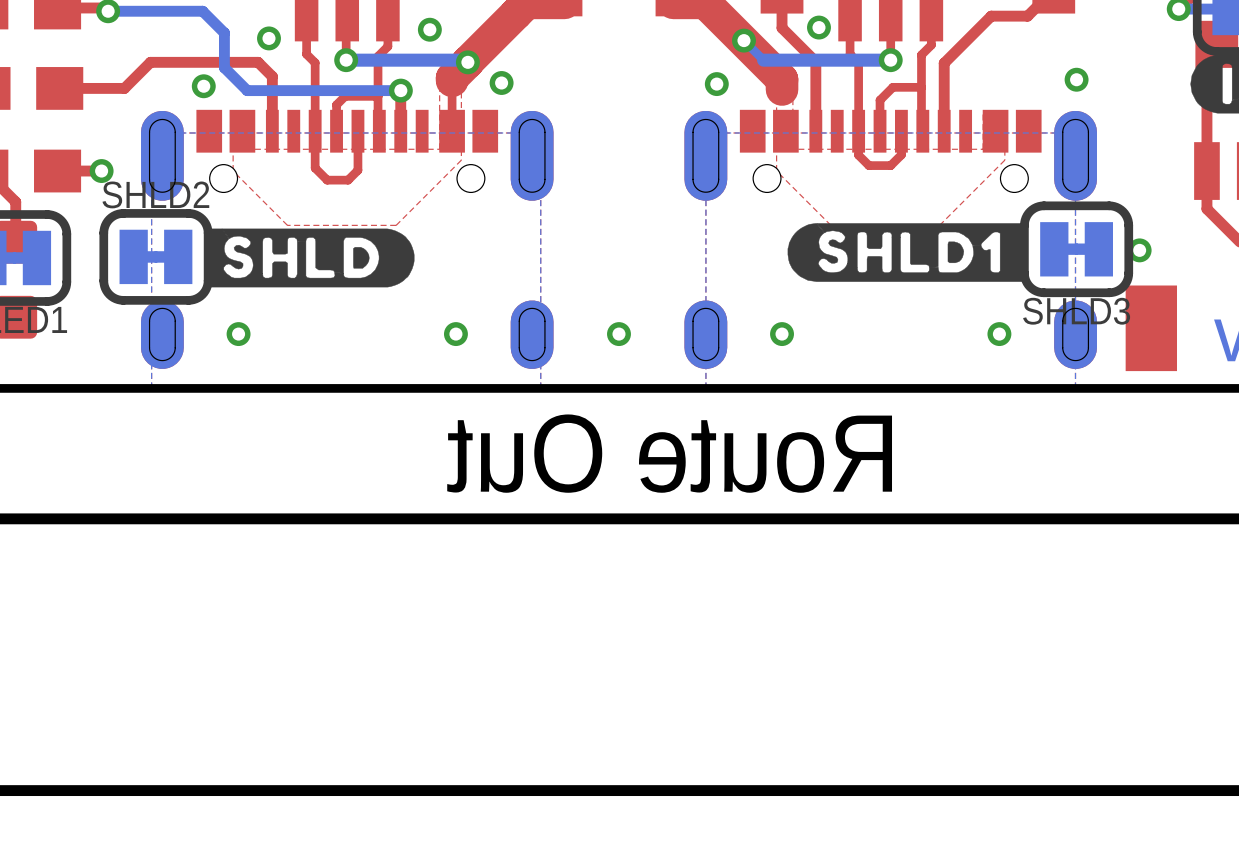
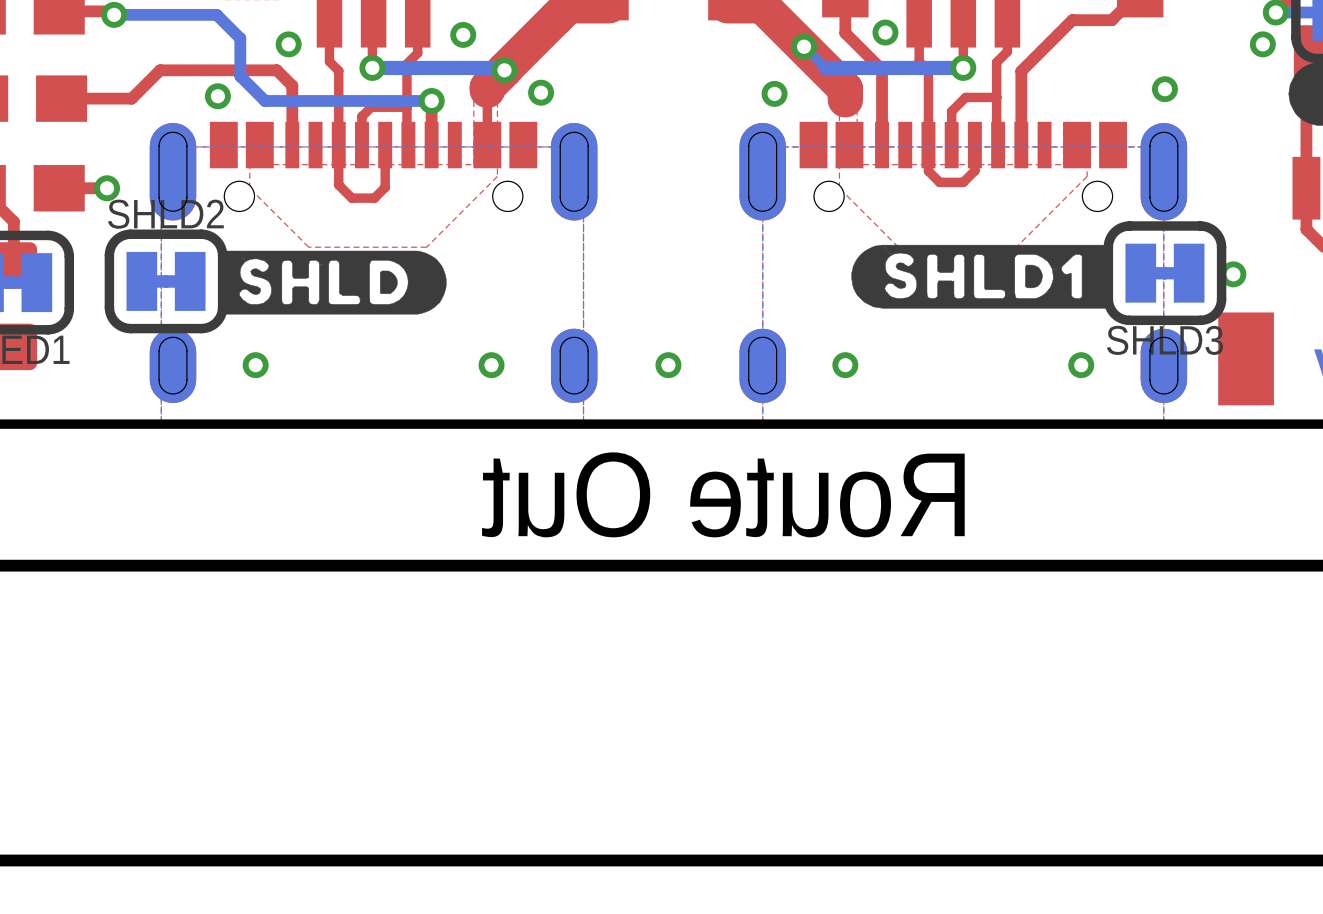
via: none -> (1262, 44)

